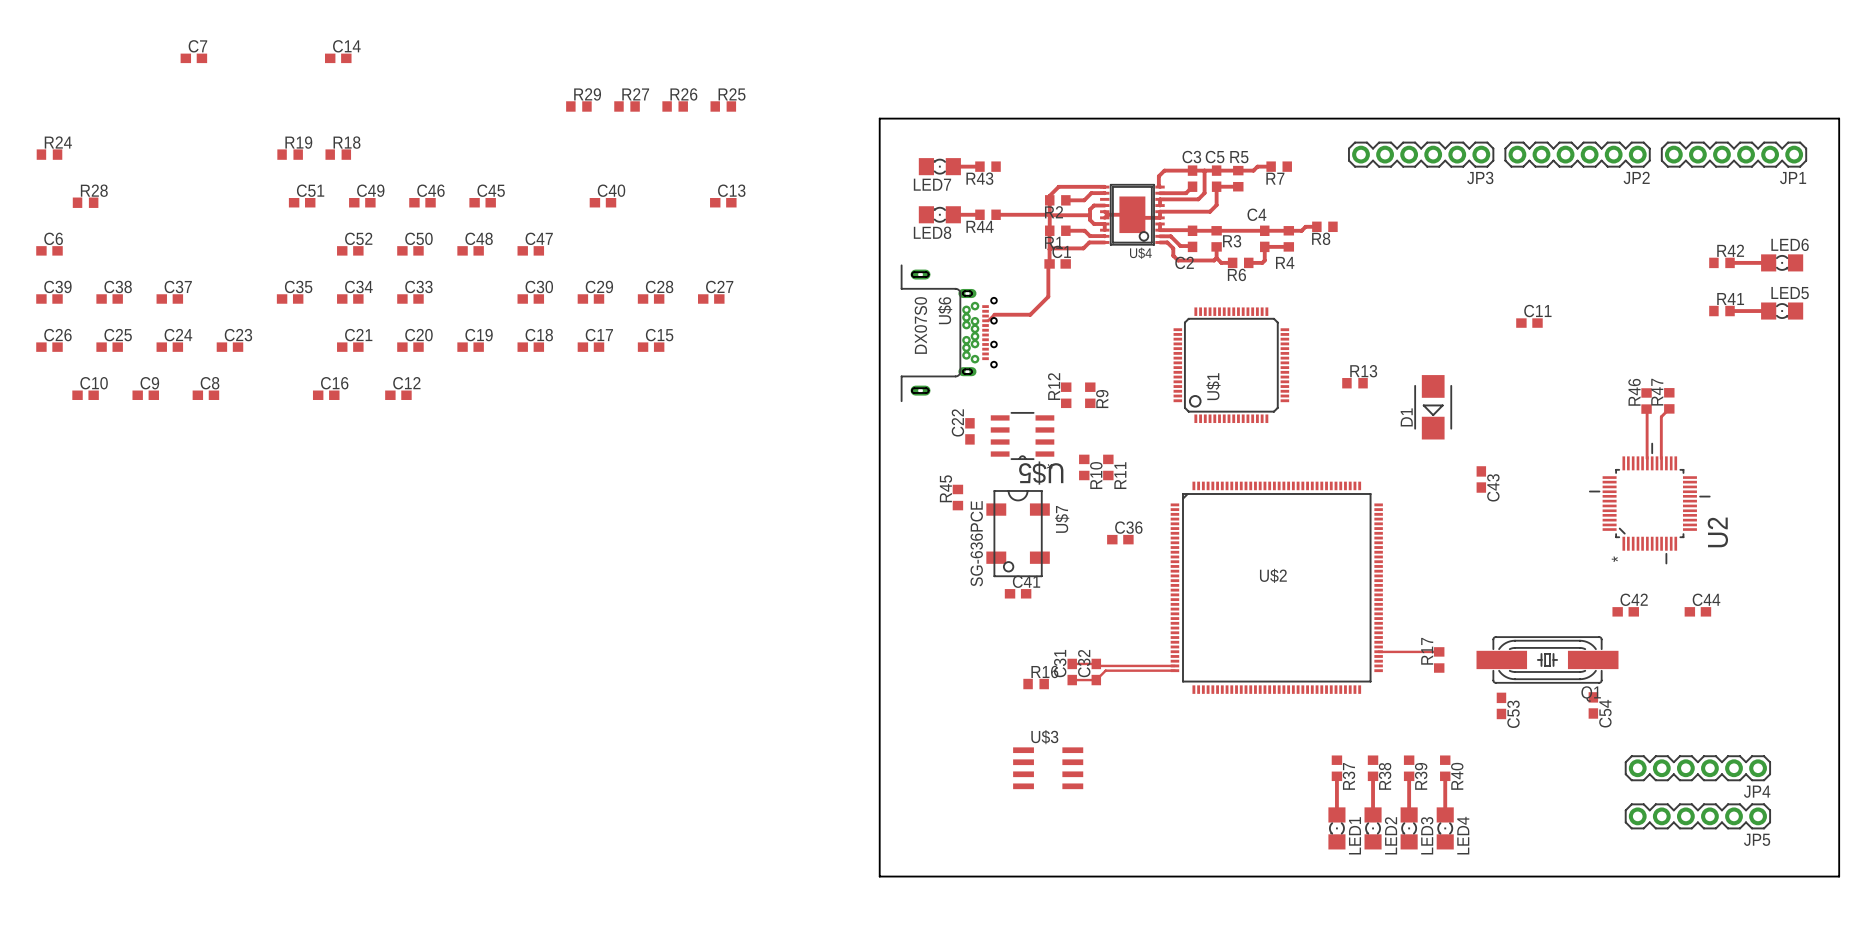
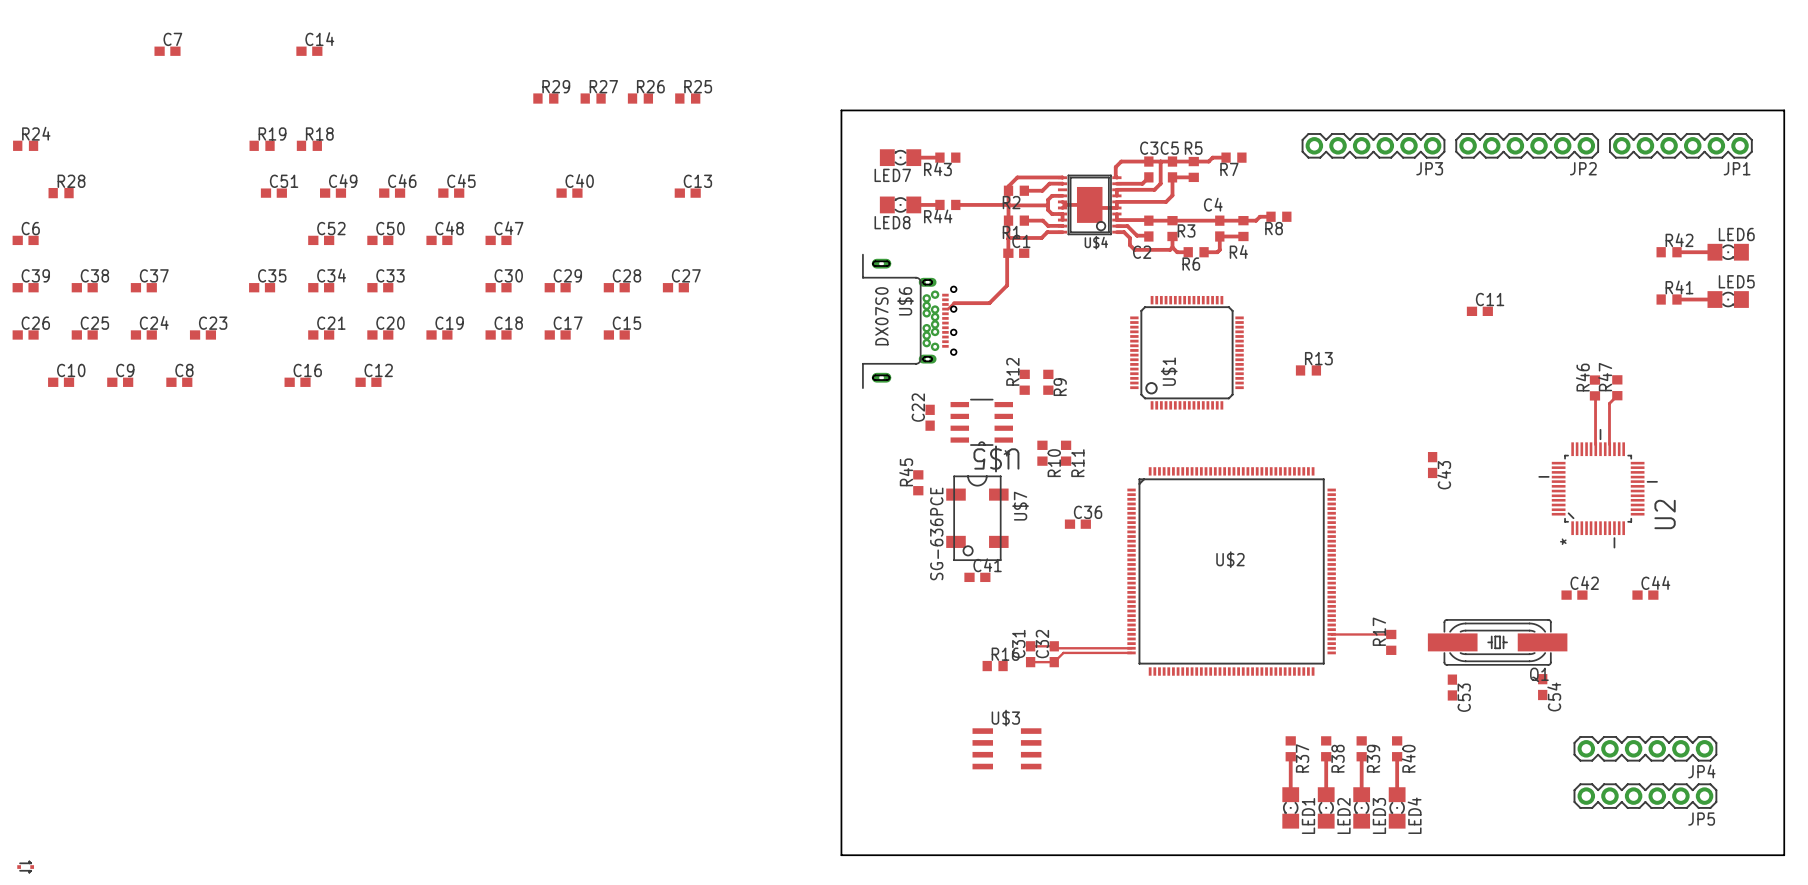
D1: (1433, 407) -> none
part: none -> (25, 867)

